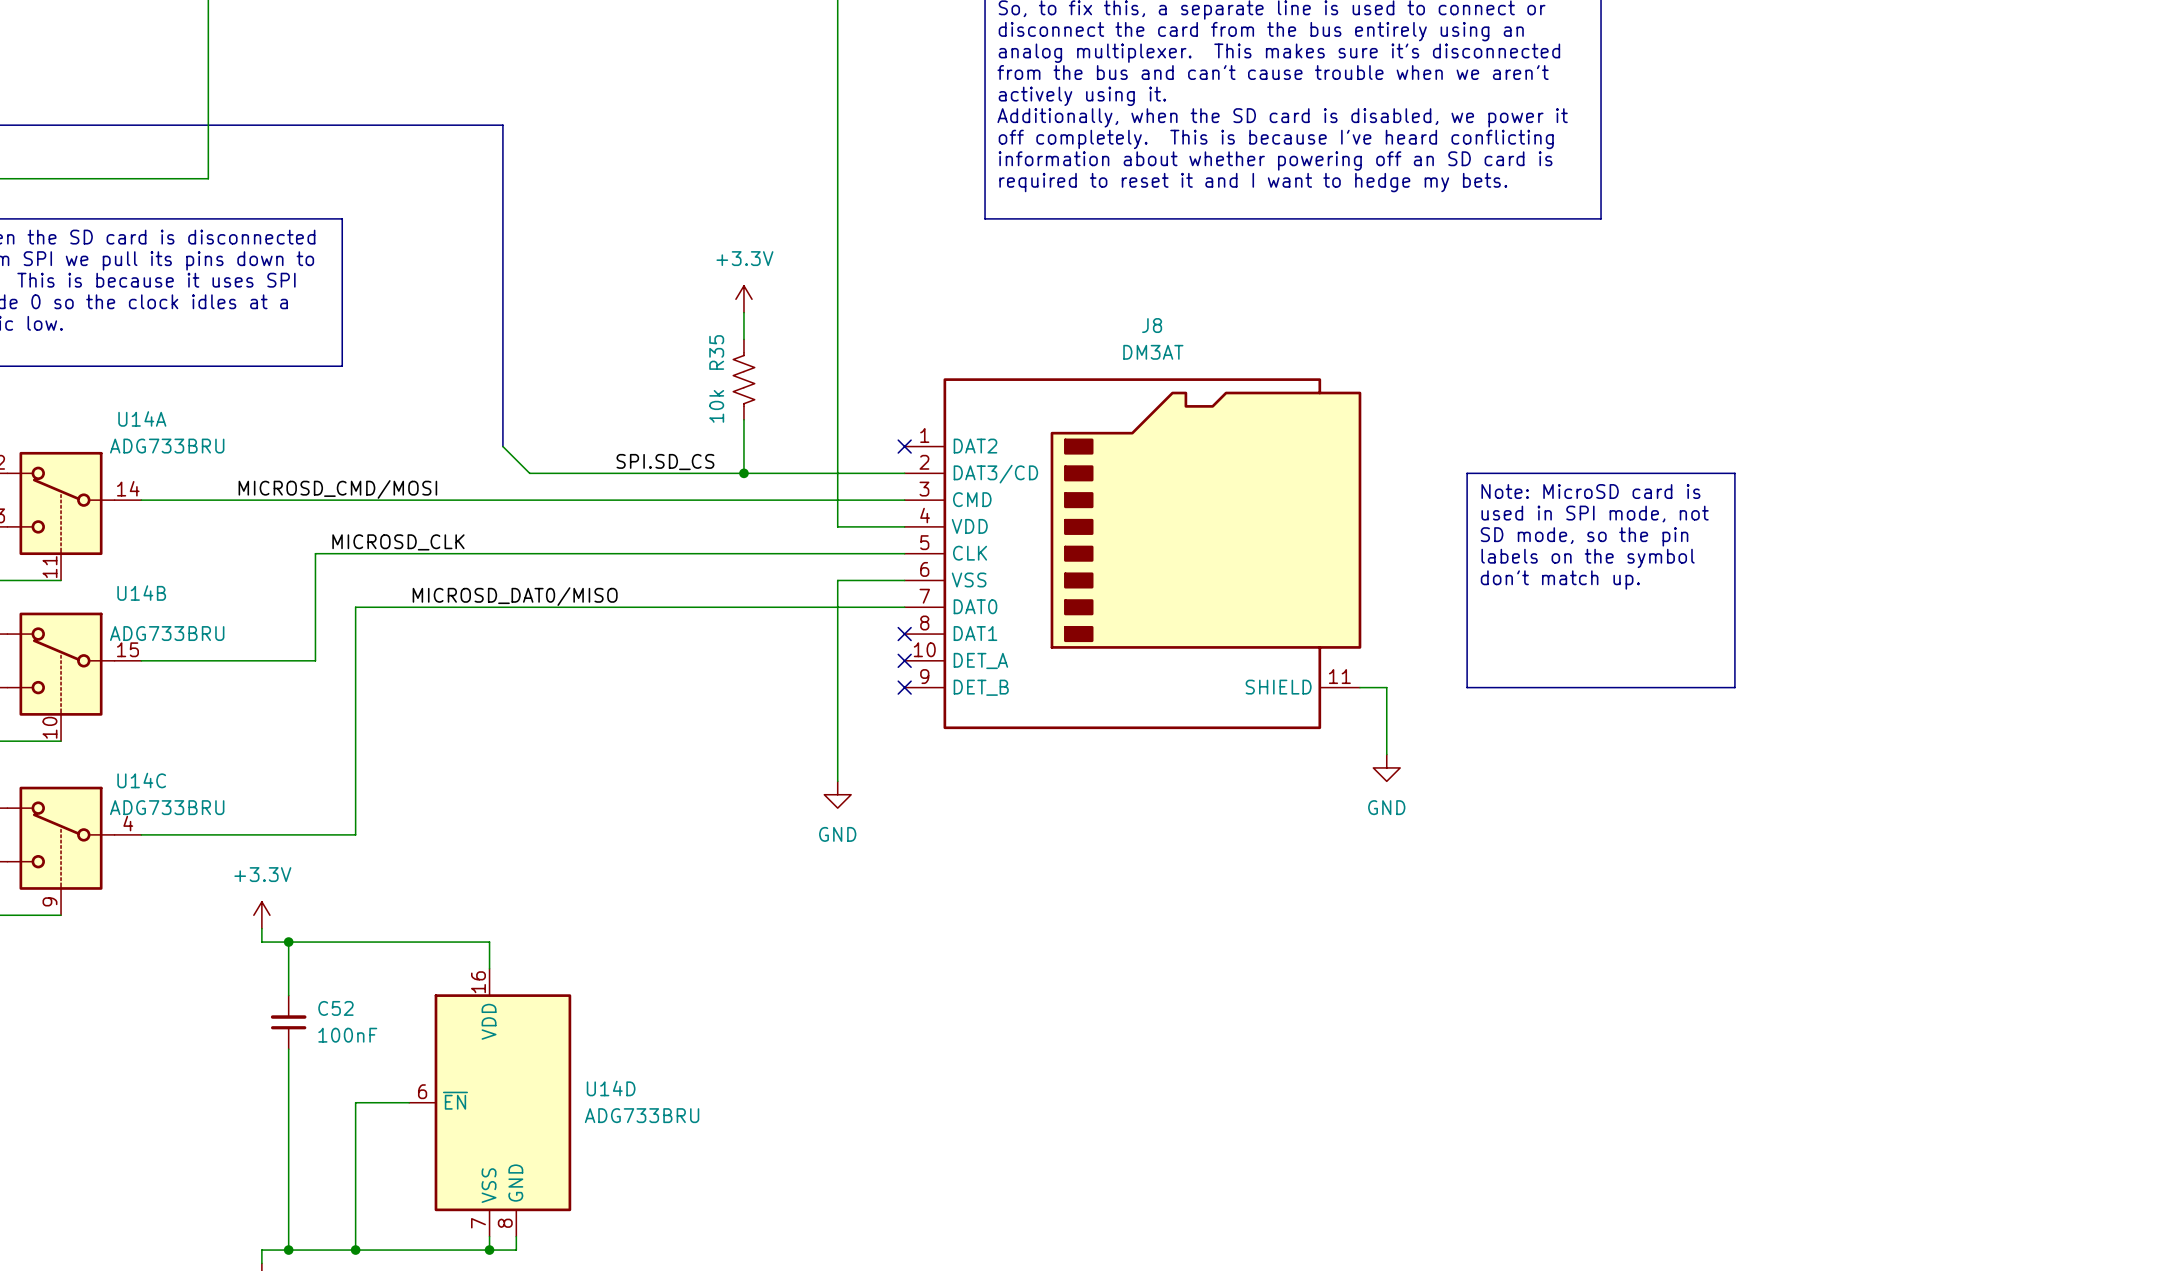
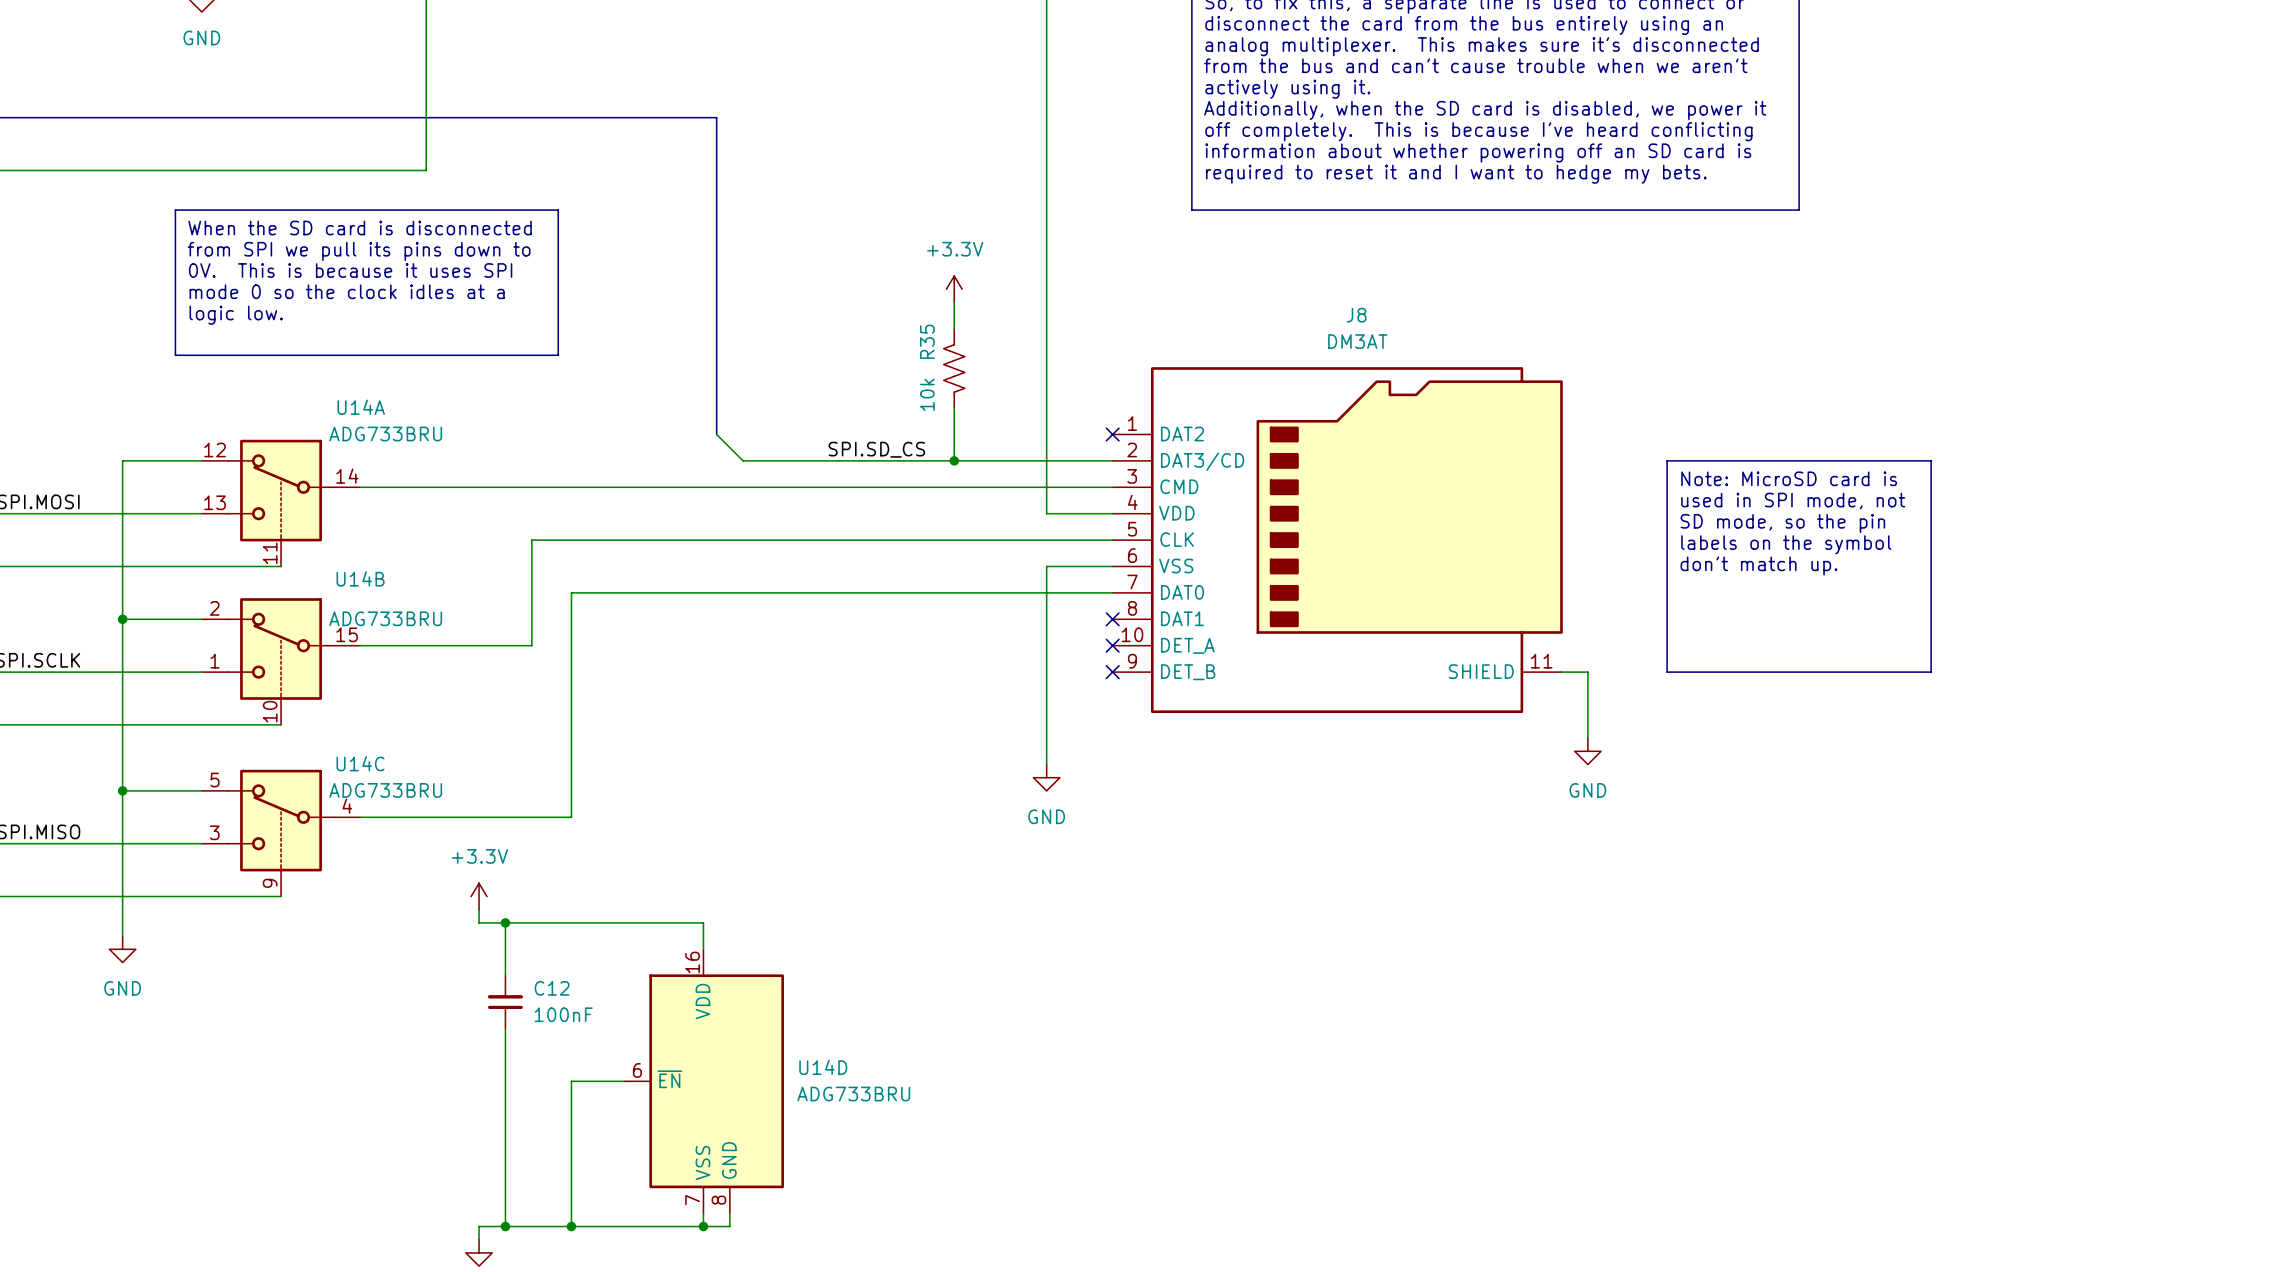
label: MICROSD_CMD/MOSI (337, 489) -> none
label: MICROSD_CLK (398, 542) -> none
label: MICROSD_DAT0/MISO (515, 596) -> none
C52 name: C52 (335, 1008) -> C12 (552, 988)

